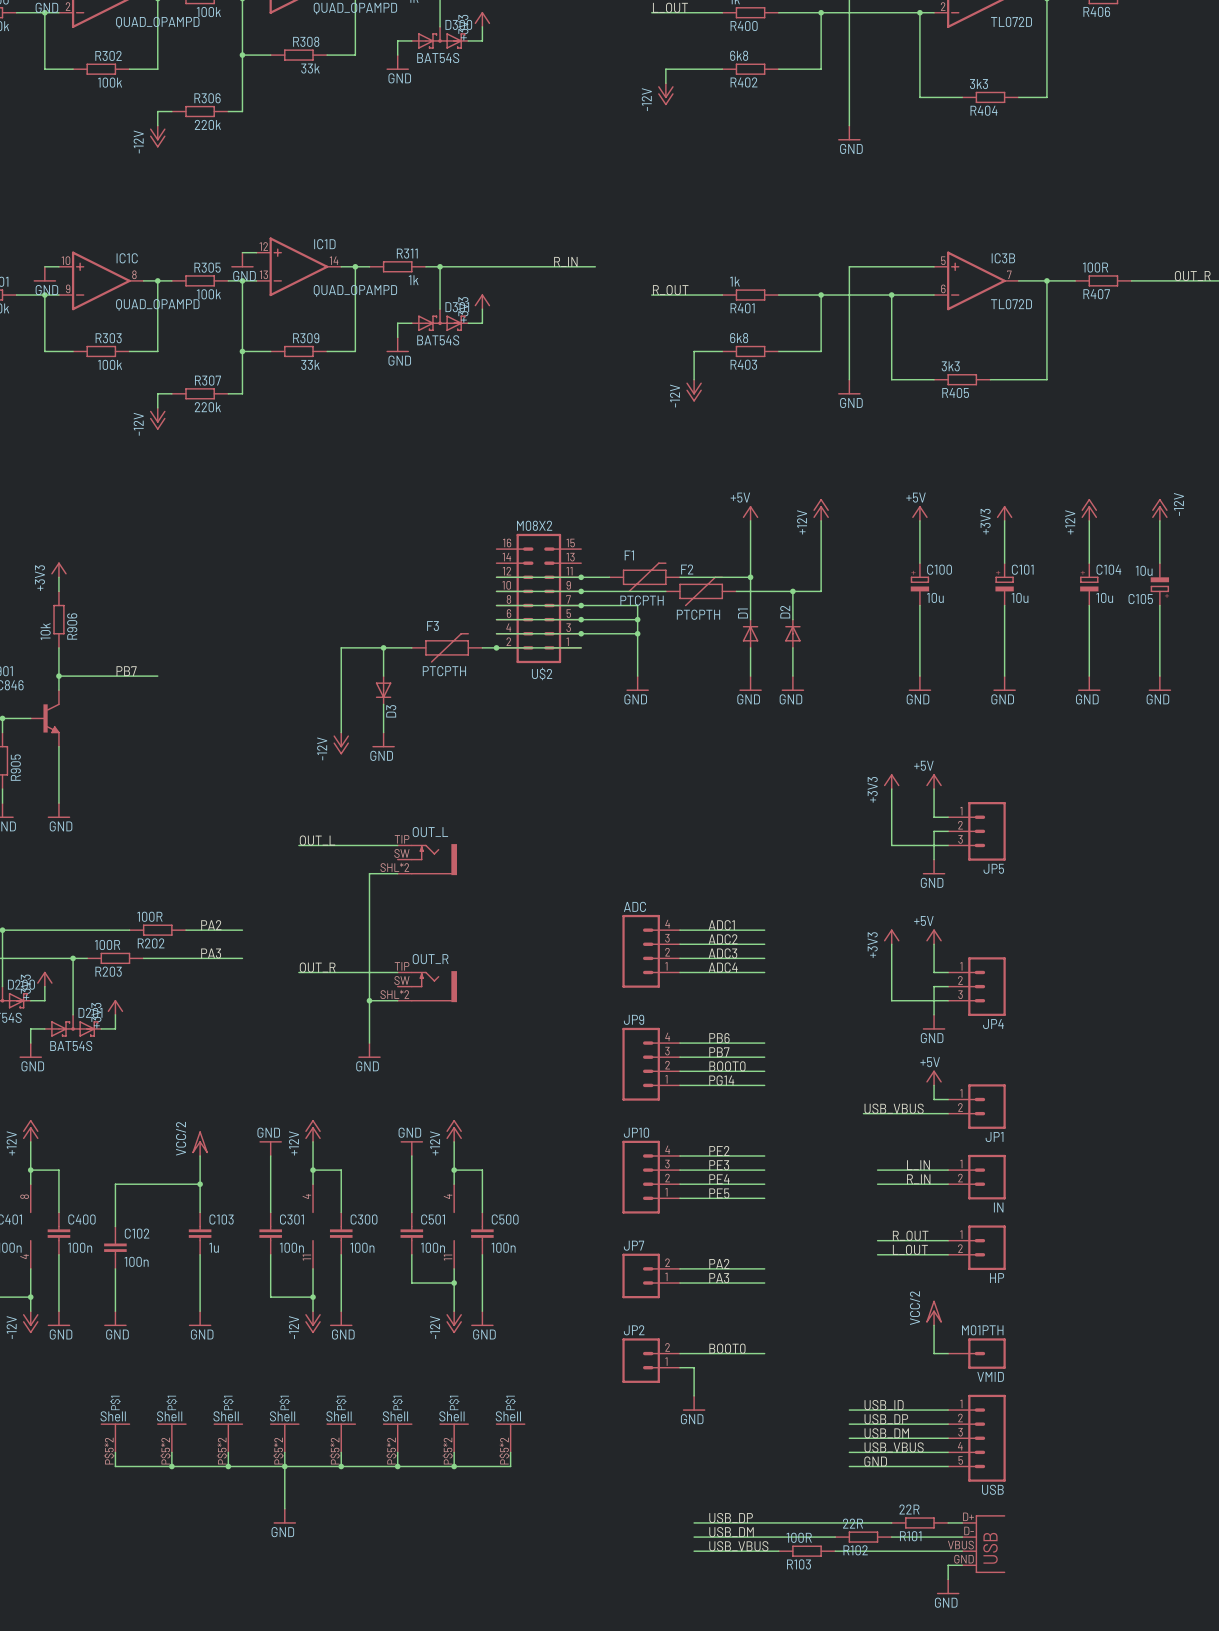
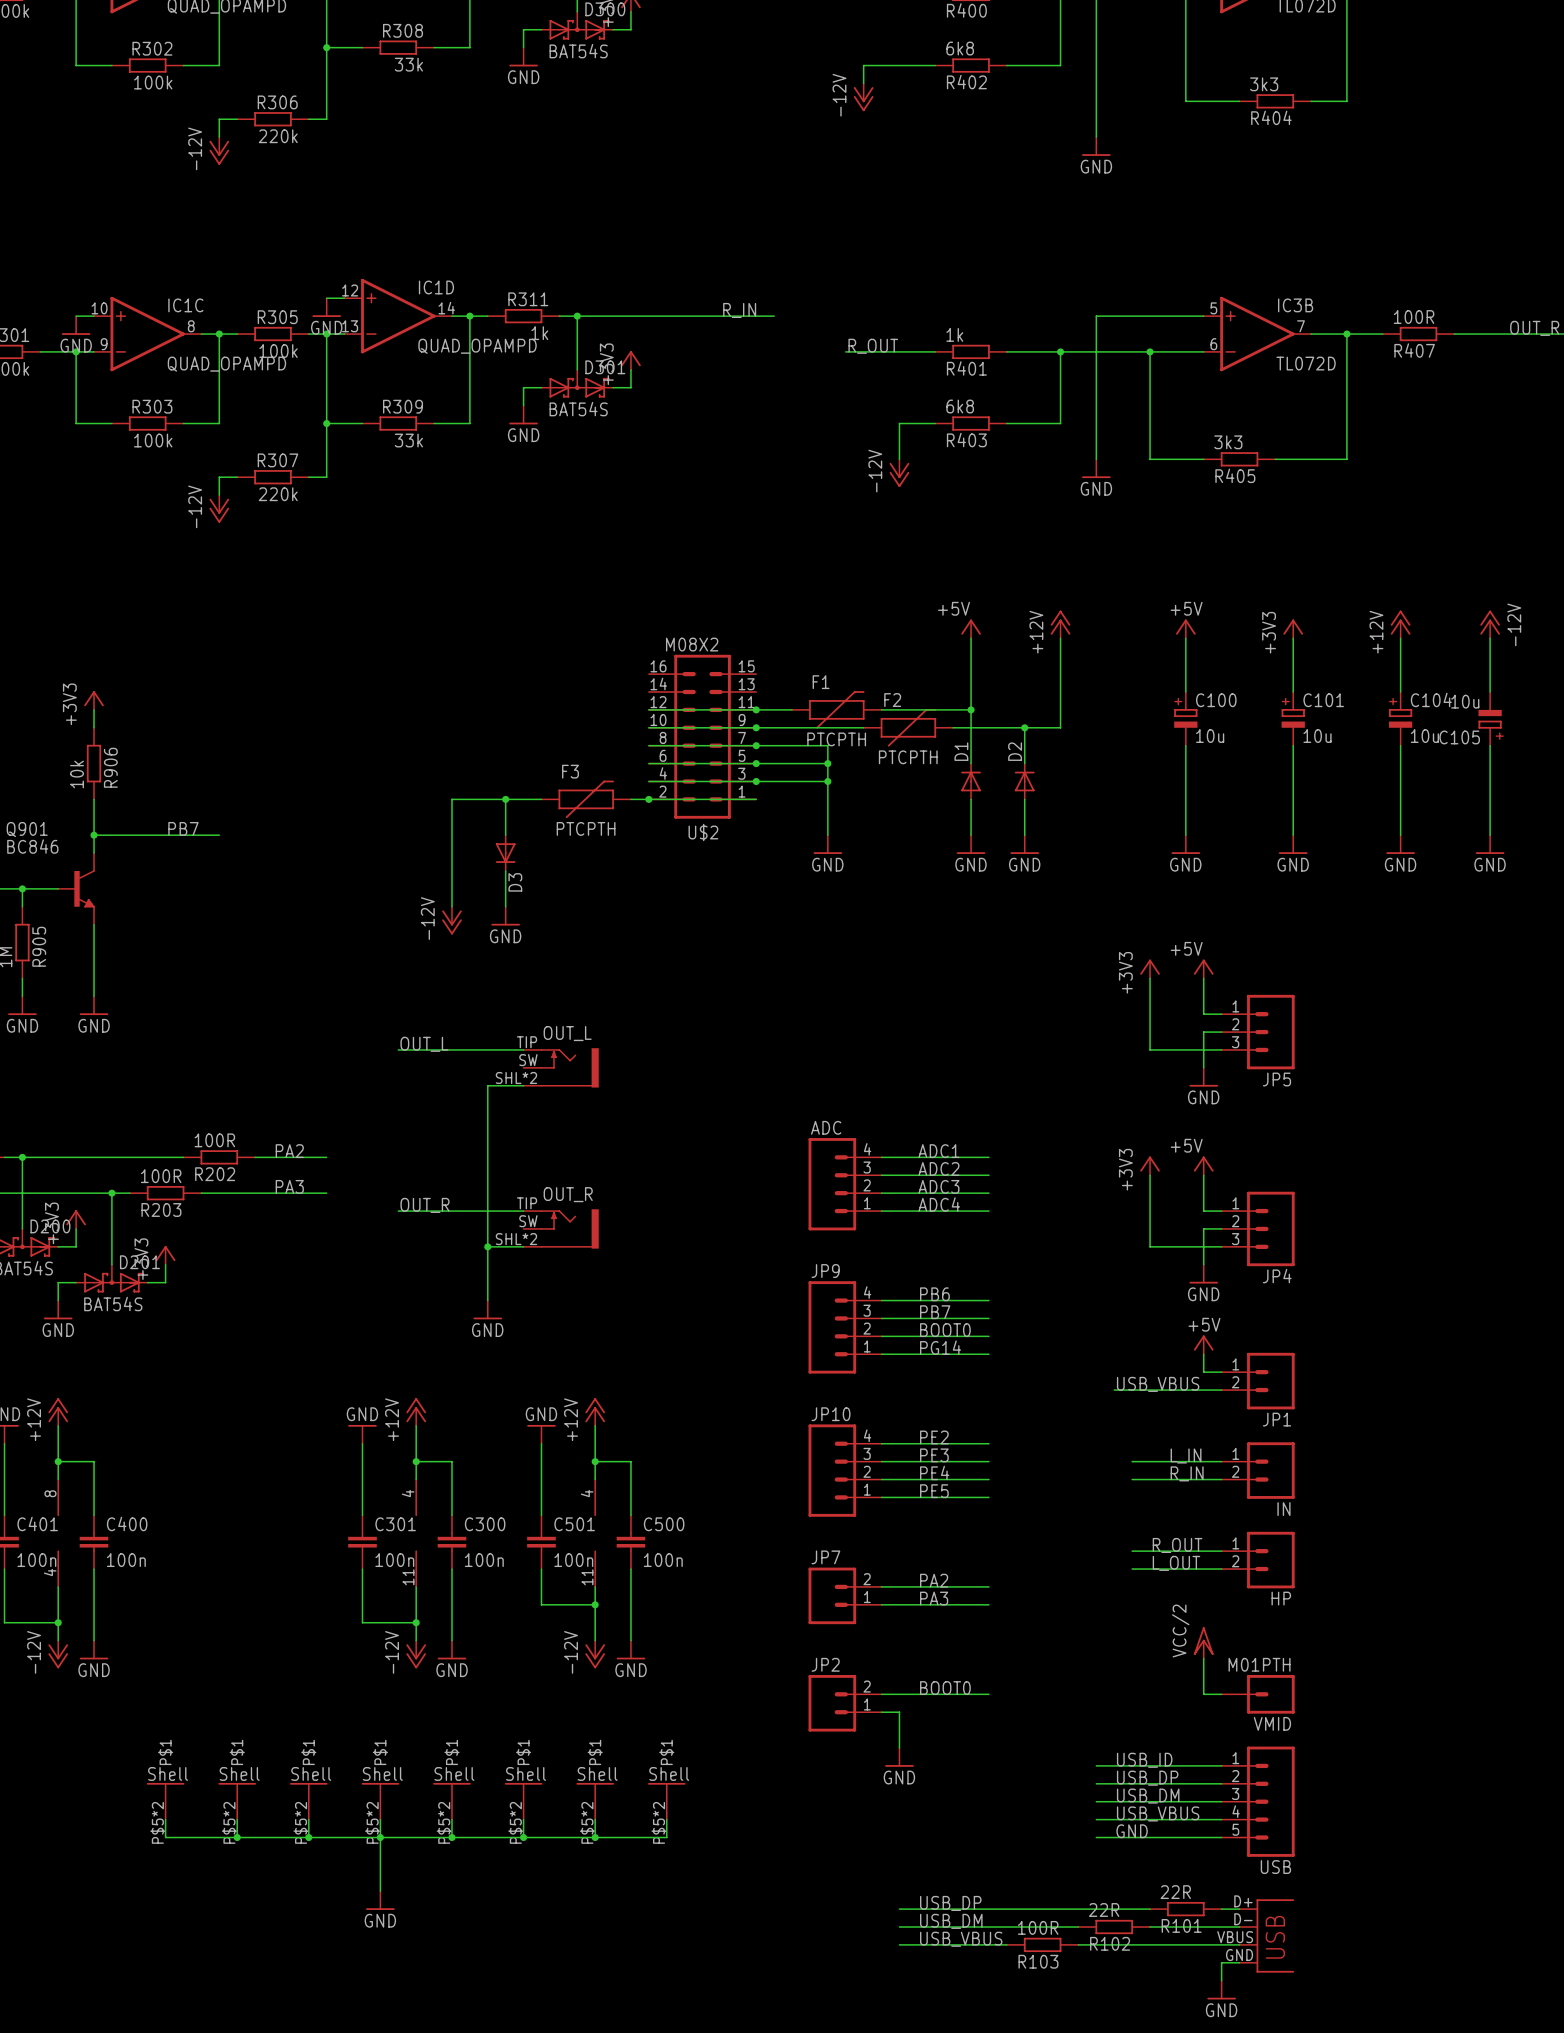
power symbol: VCC/2 (200, 1143) -> none
wire: (200, 1155) (200, 1212) -> none
wire: (200, 1184) (115, 1184) (115, 1226) -> none
junction: (200, 1184) -> none
C103: 1u (200, 1233) -> none
C102: 100n (115, 1247) -> none
wire: (200, 1254) (200, 1311) -> none
wire: (115, 1268) (115, 1311) -> none
power symbol: GND (115, 1318) -> none
power symbol: GND (200, 1318) -> none

